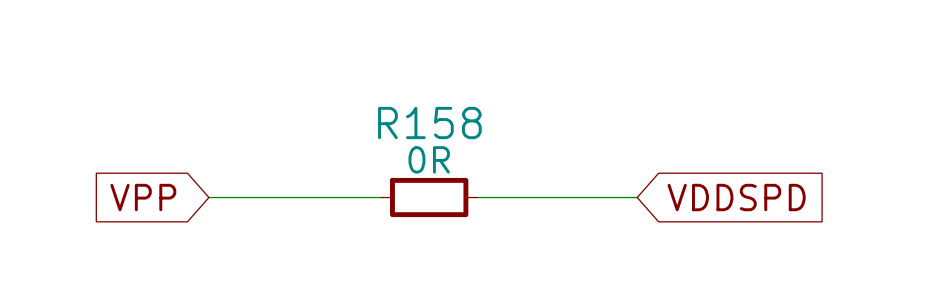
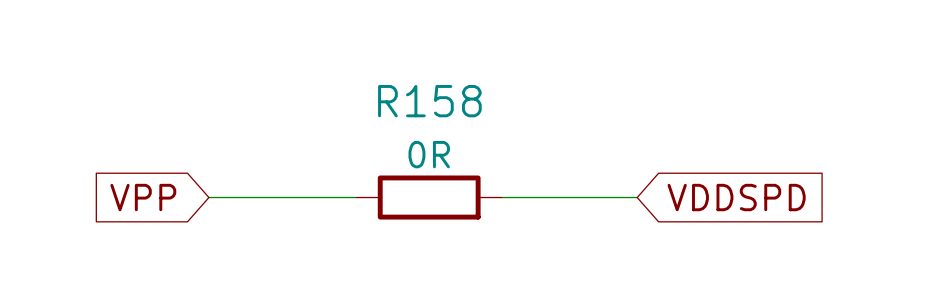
R158 symbol: [380, 177, 479, 218] -> [355, 175, 503, 220]

